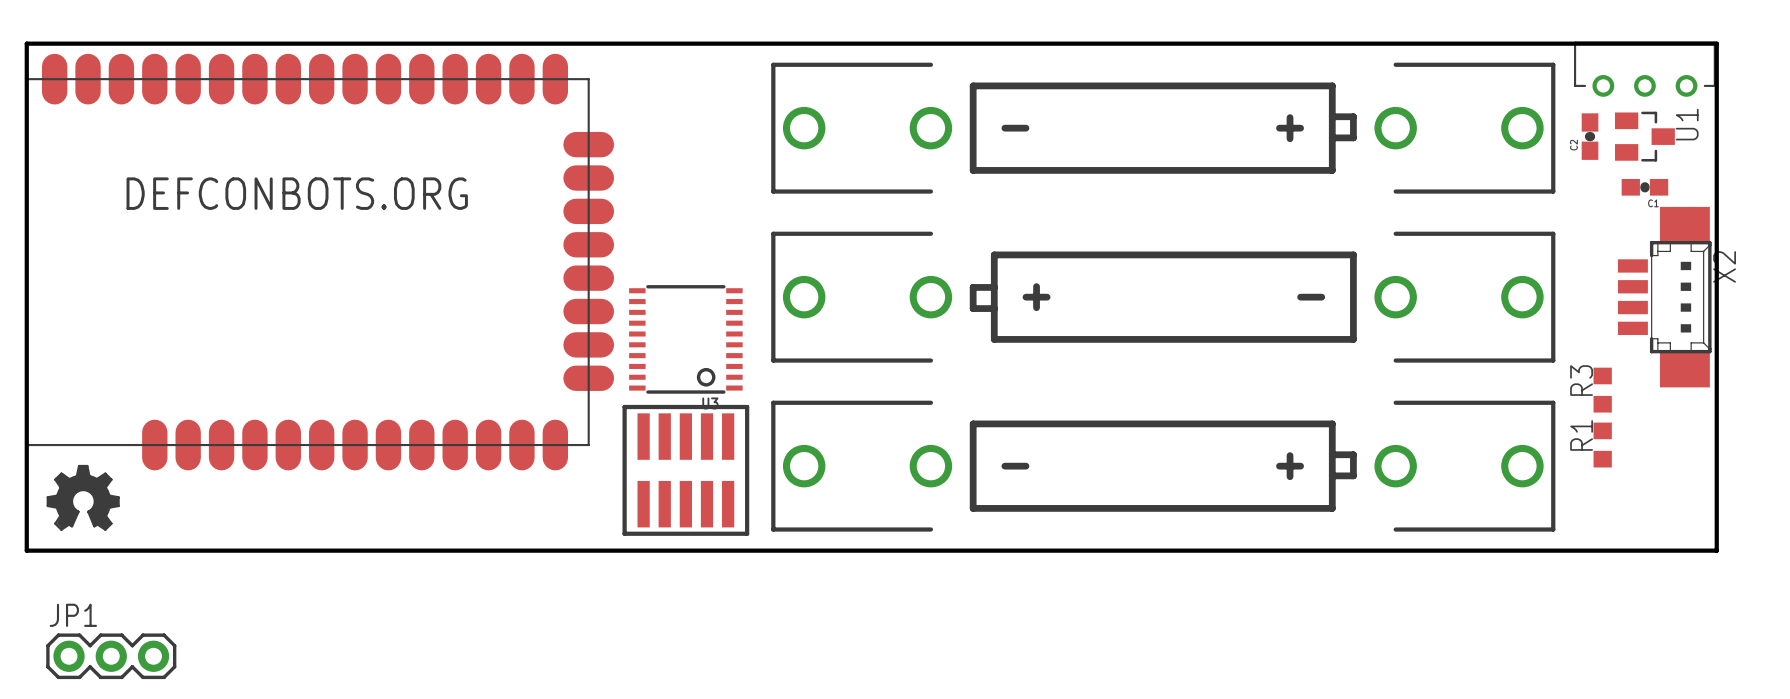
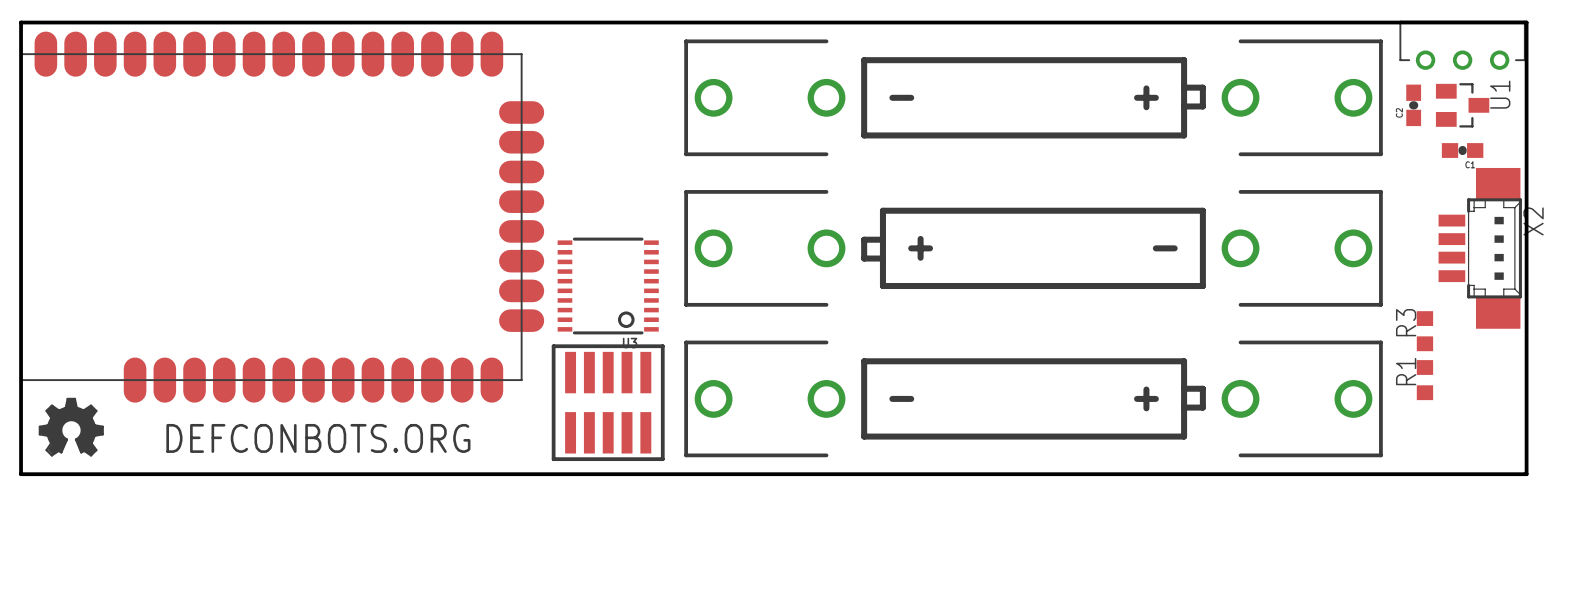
text position: DEFCONBOTS.ORG (297, 193) -> DEFCONBOTS.ORG (318, 438)
JP1: (111, 656) -> none

